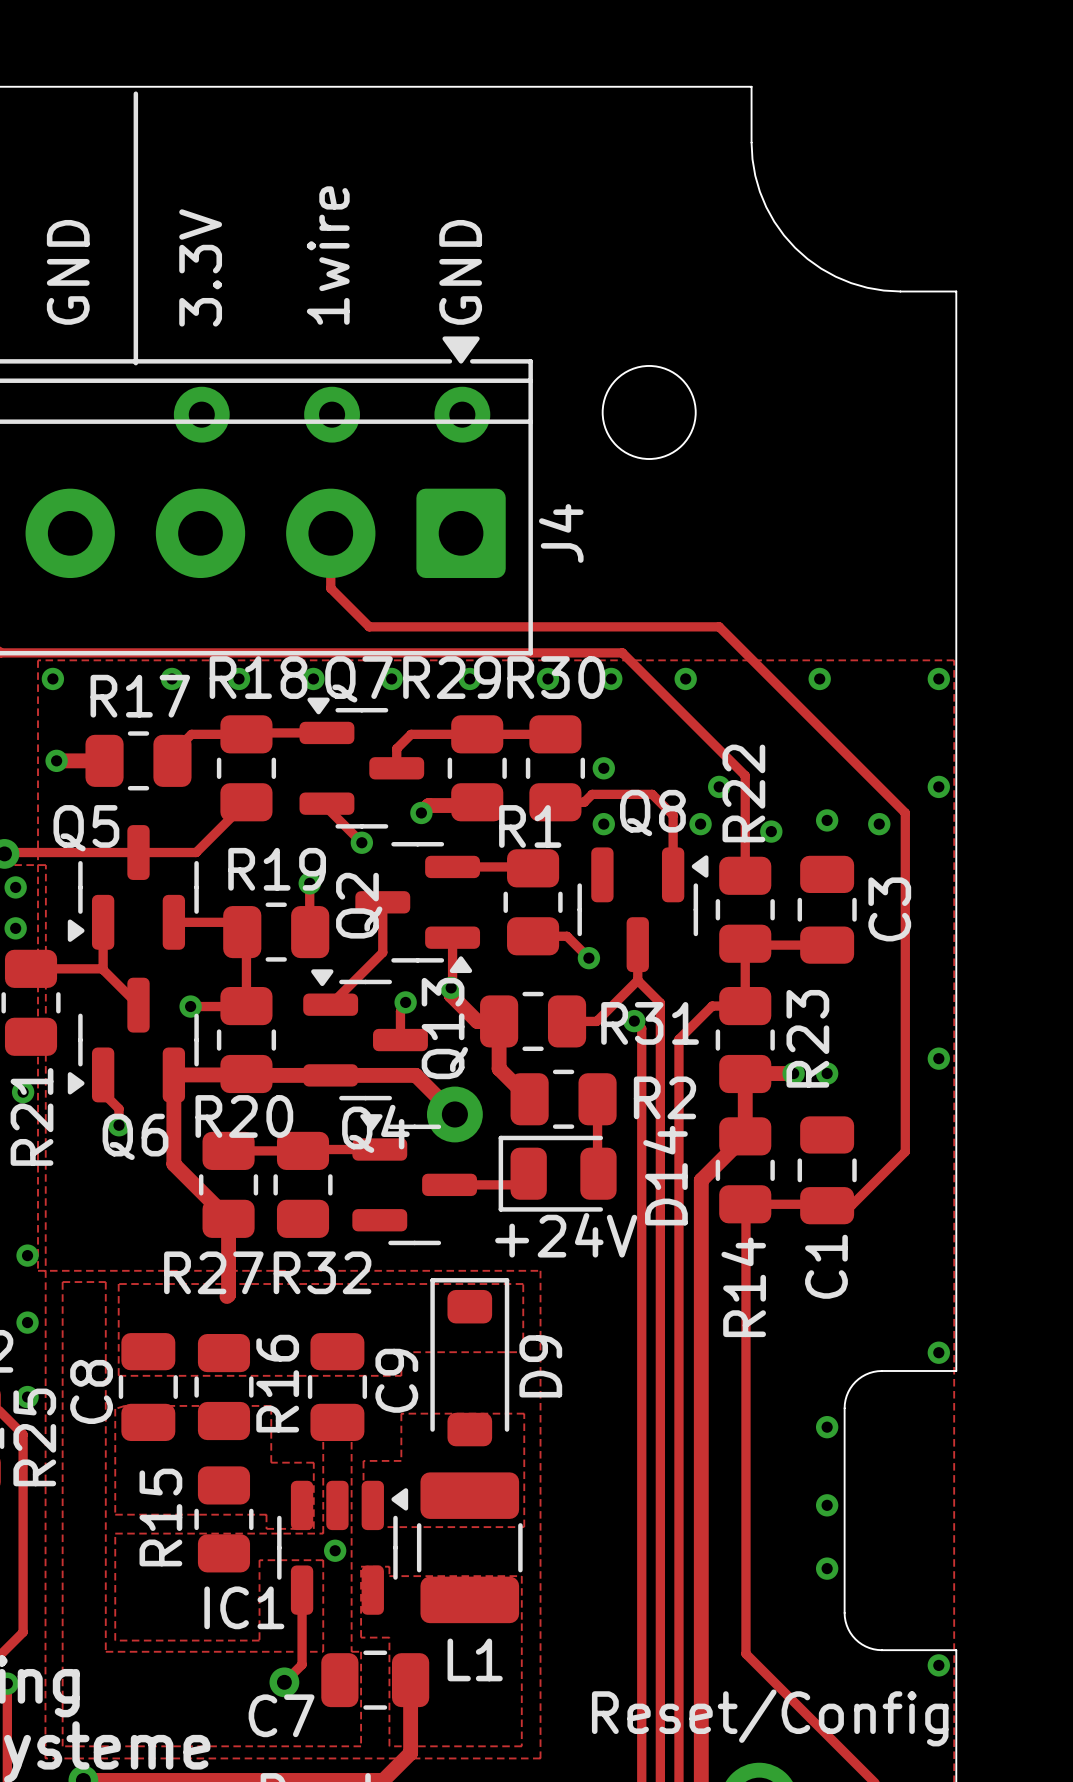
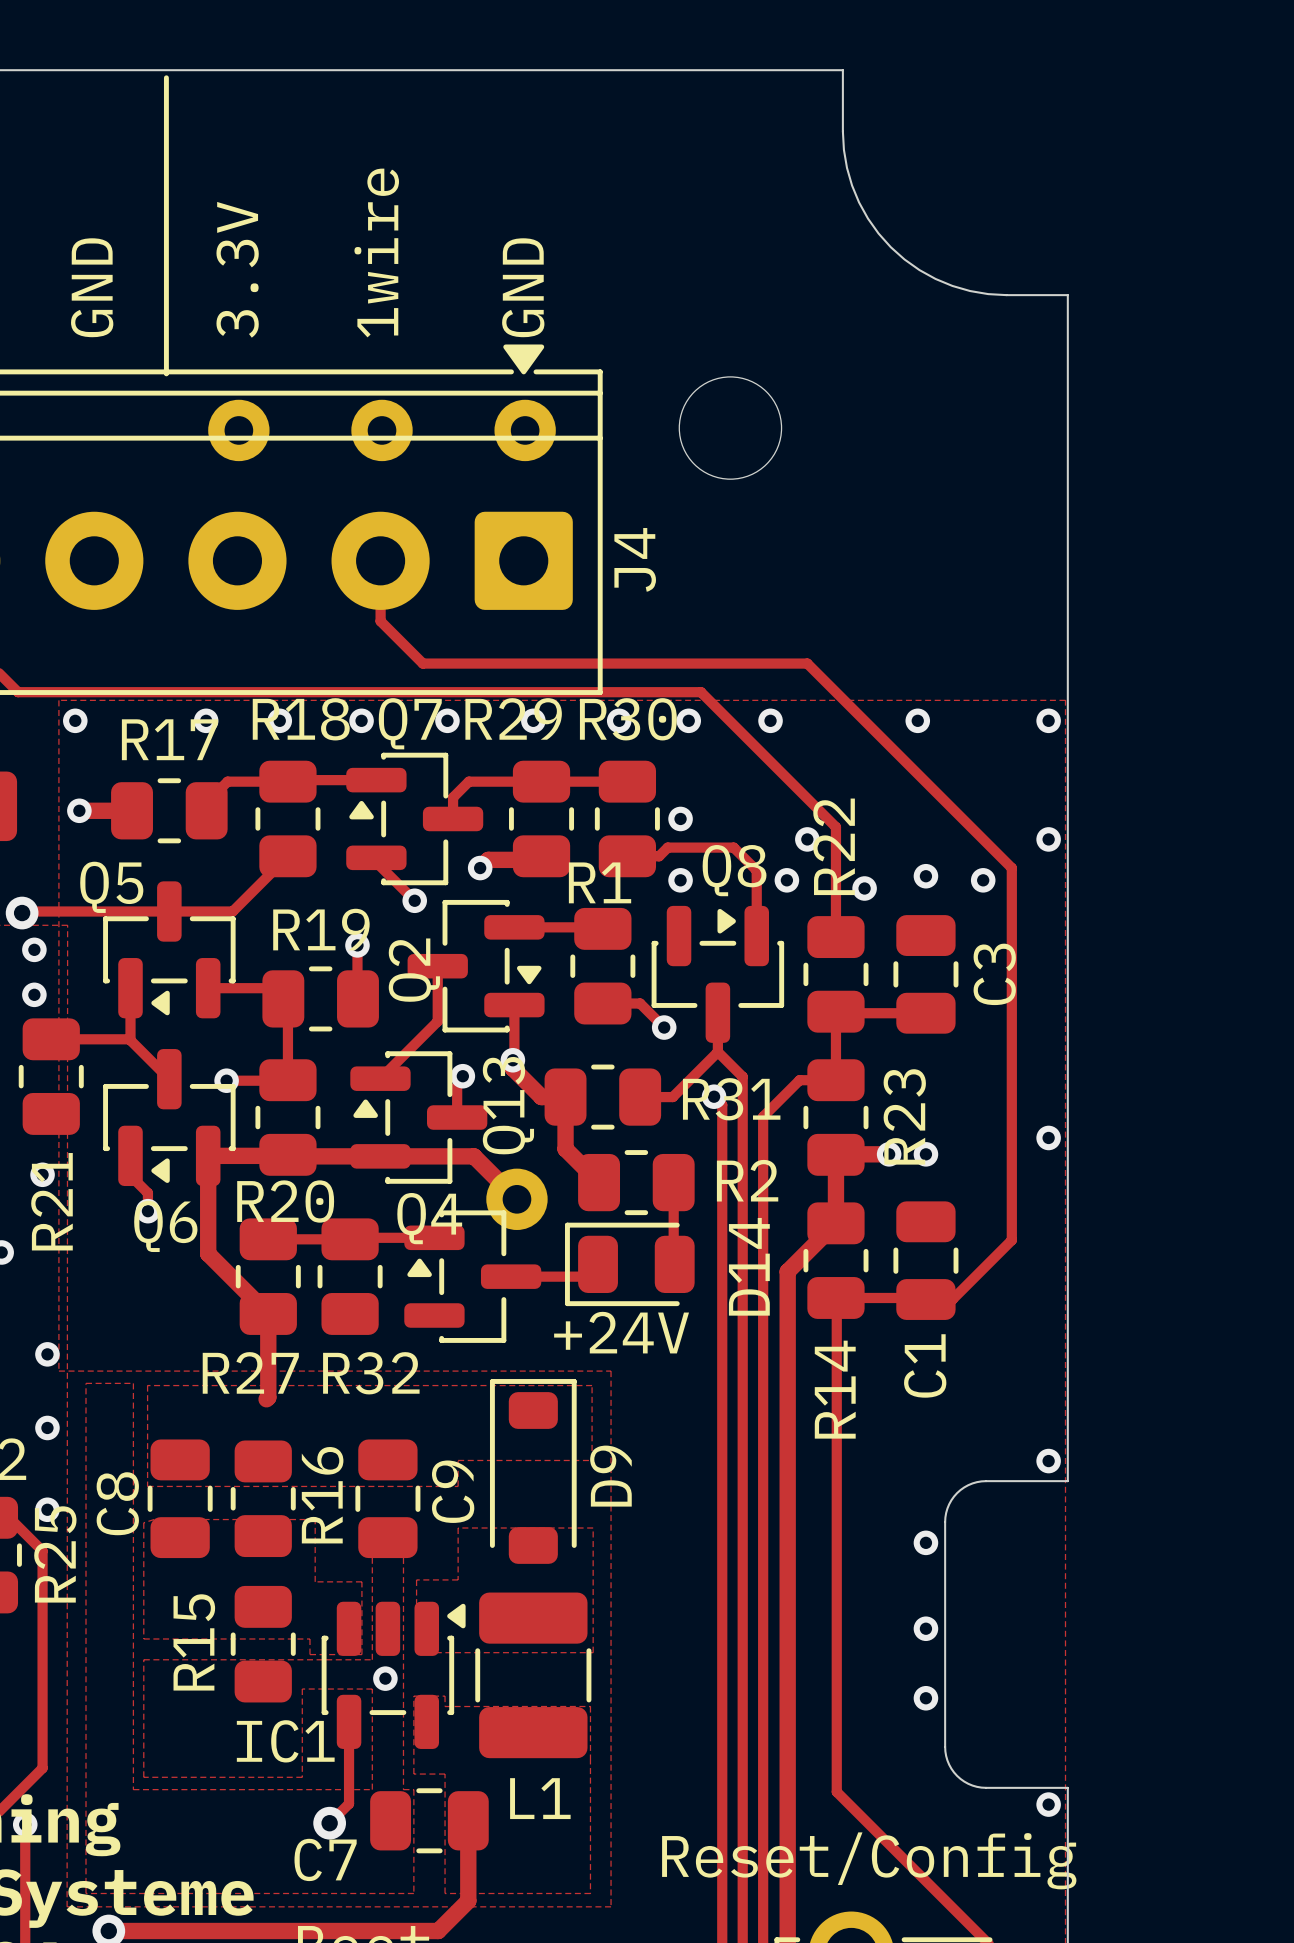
Q7 footprint: [299, 697, 425, 829] -> [346, 752, 484, 886]
Q5 footprint: [67, 825, 199, 950] -> [103, 881, 236, 1019]
Q2 footprint: [355, 842, 481, 974] -> [407, 899, 545, 1033]
Q8 footprint: [577, 847, 709, 973] -> [651, 905, 785, 1043]
Q4 footprint: [303, 969, 428, 1101] -> [350, 1051, 488, 1184]
Q6 footprint: [67, 977, 199, 1103] -> [103, 1049, 236, 1187]
Q13 footprint: [352, 1114, 478, 1246] -> [404, 1210, 542, 1343]
IC1 footprint: [277, 1480, 409, 1615] -> [321, 1601, 466, 1749]

